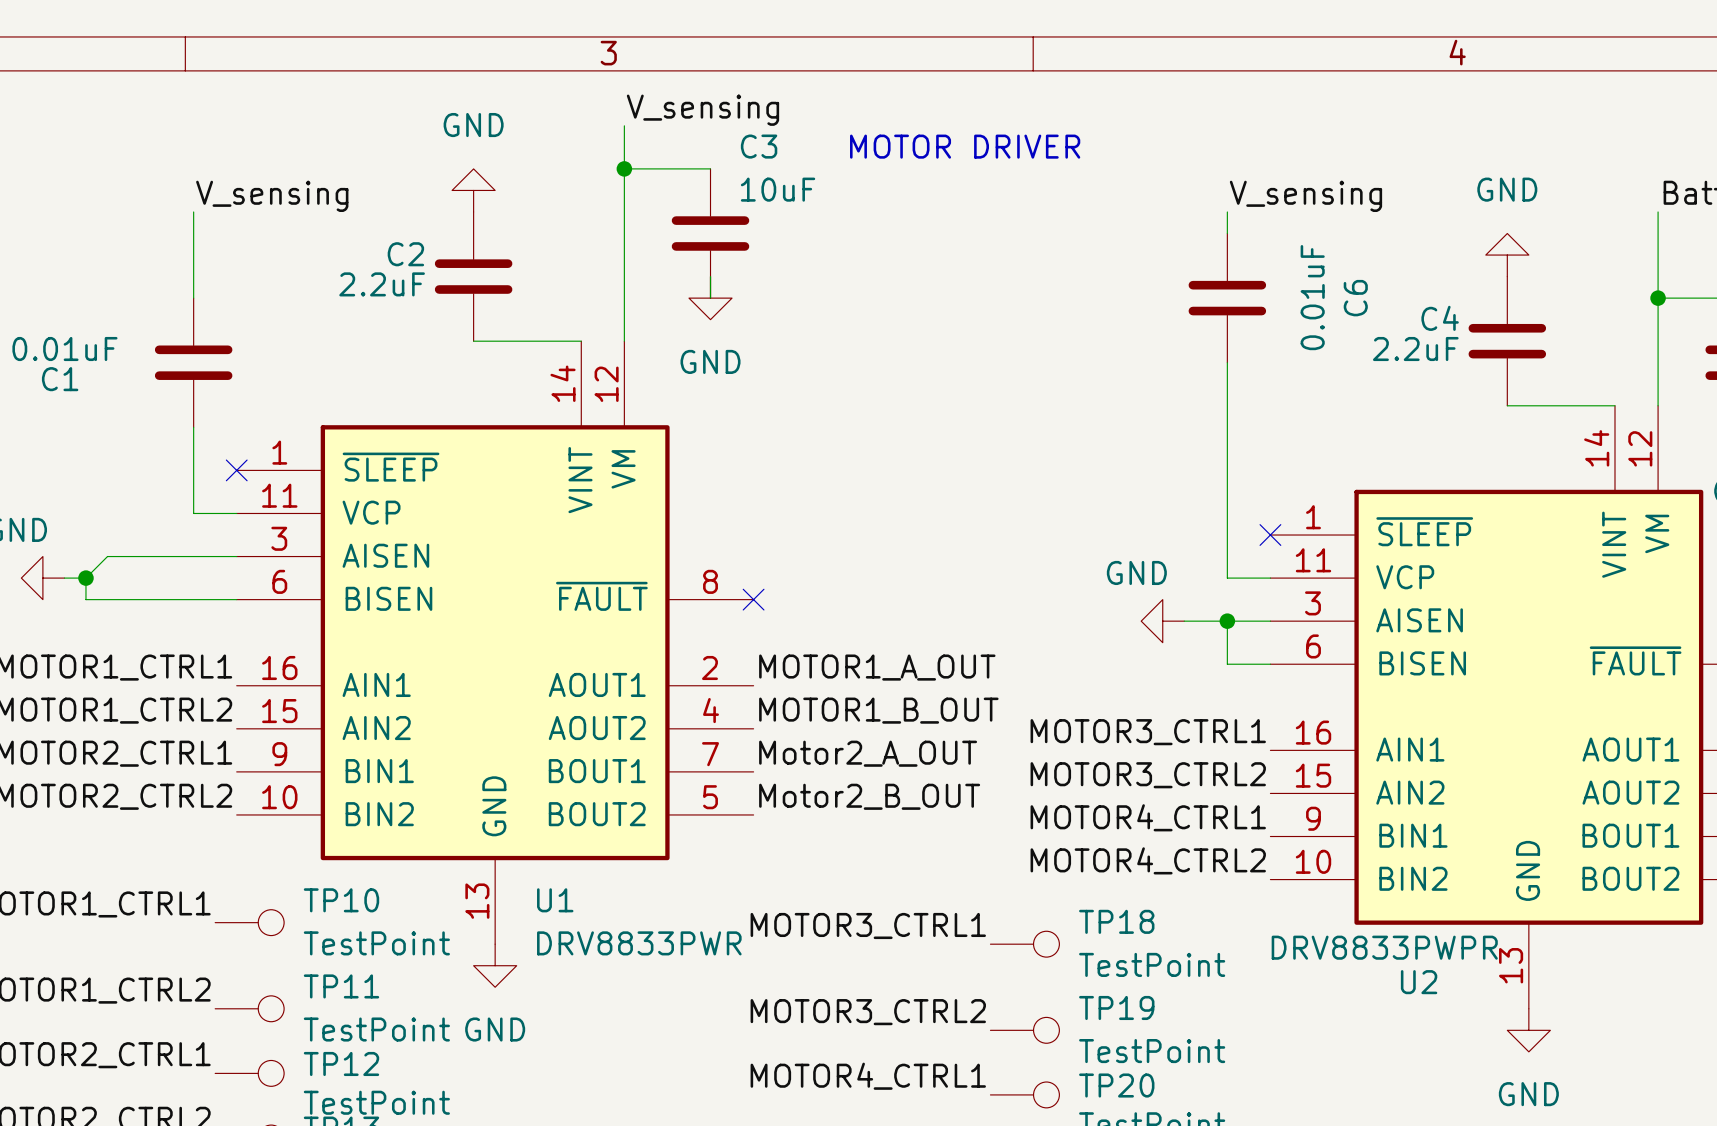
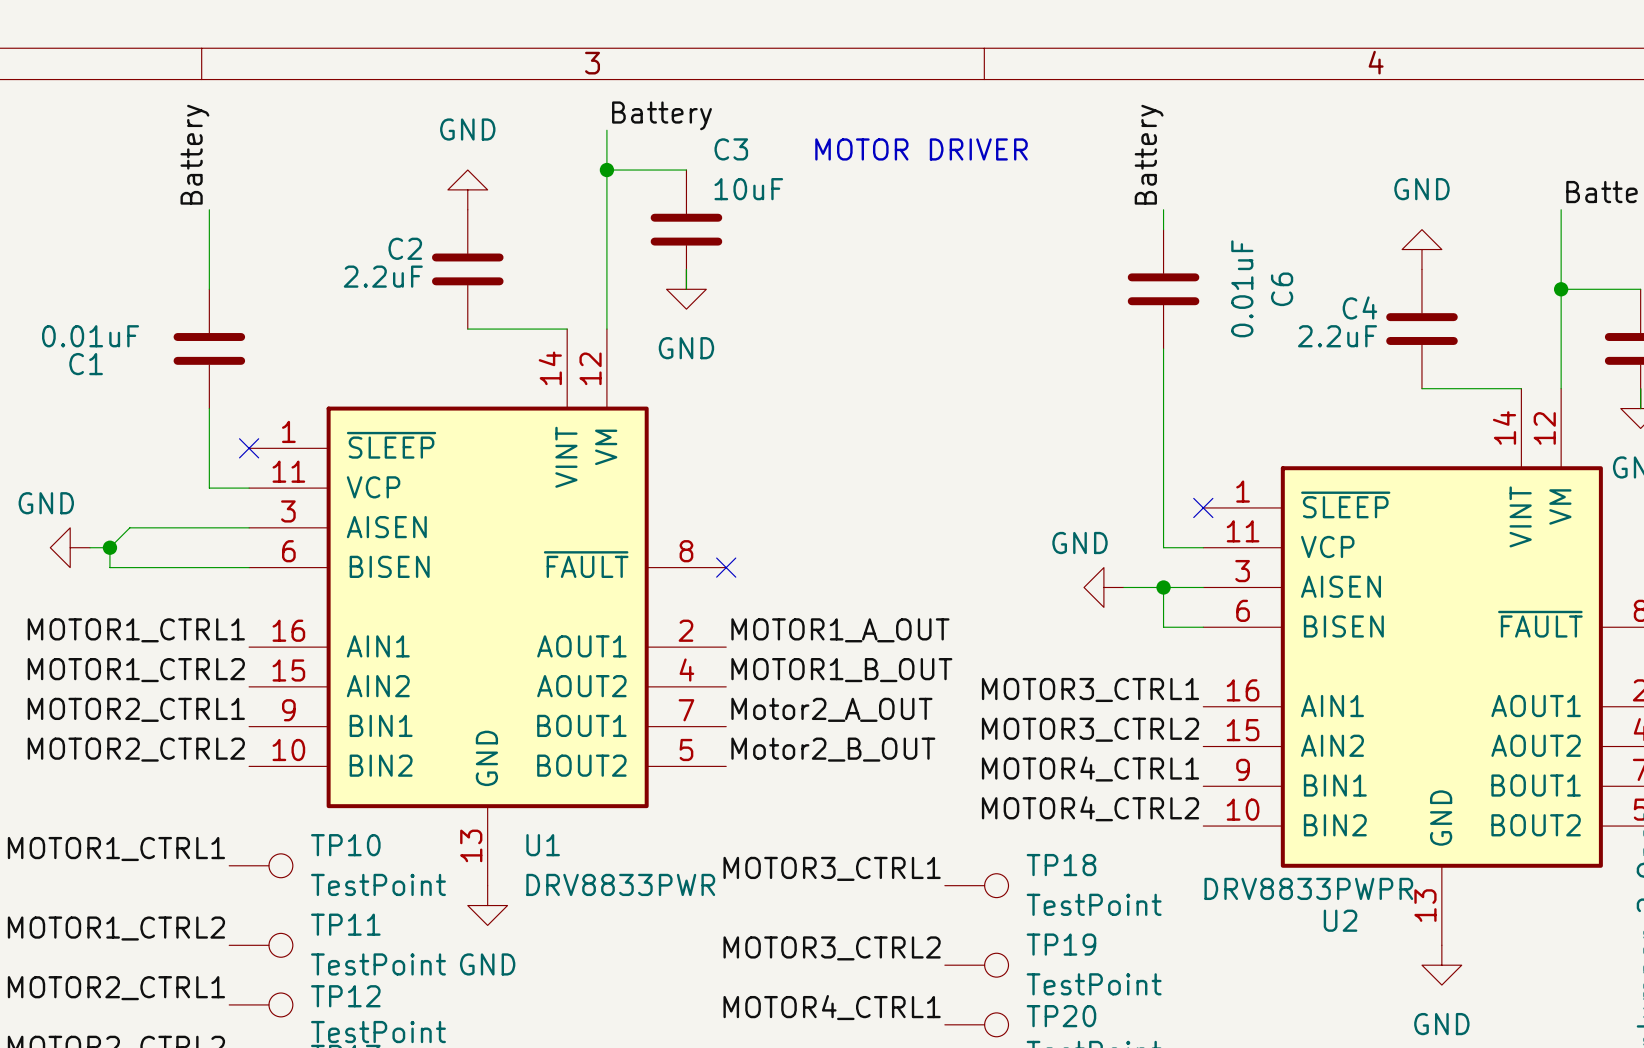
label: V_sensing (702, 110) -> Battery (661, 115)
label: V_sensing (272, 196) -> Battery (194, 154)
label: V_sensing (1305, 196) -> Battery (1149, 154)

